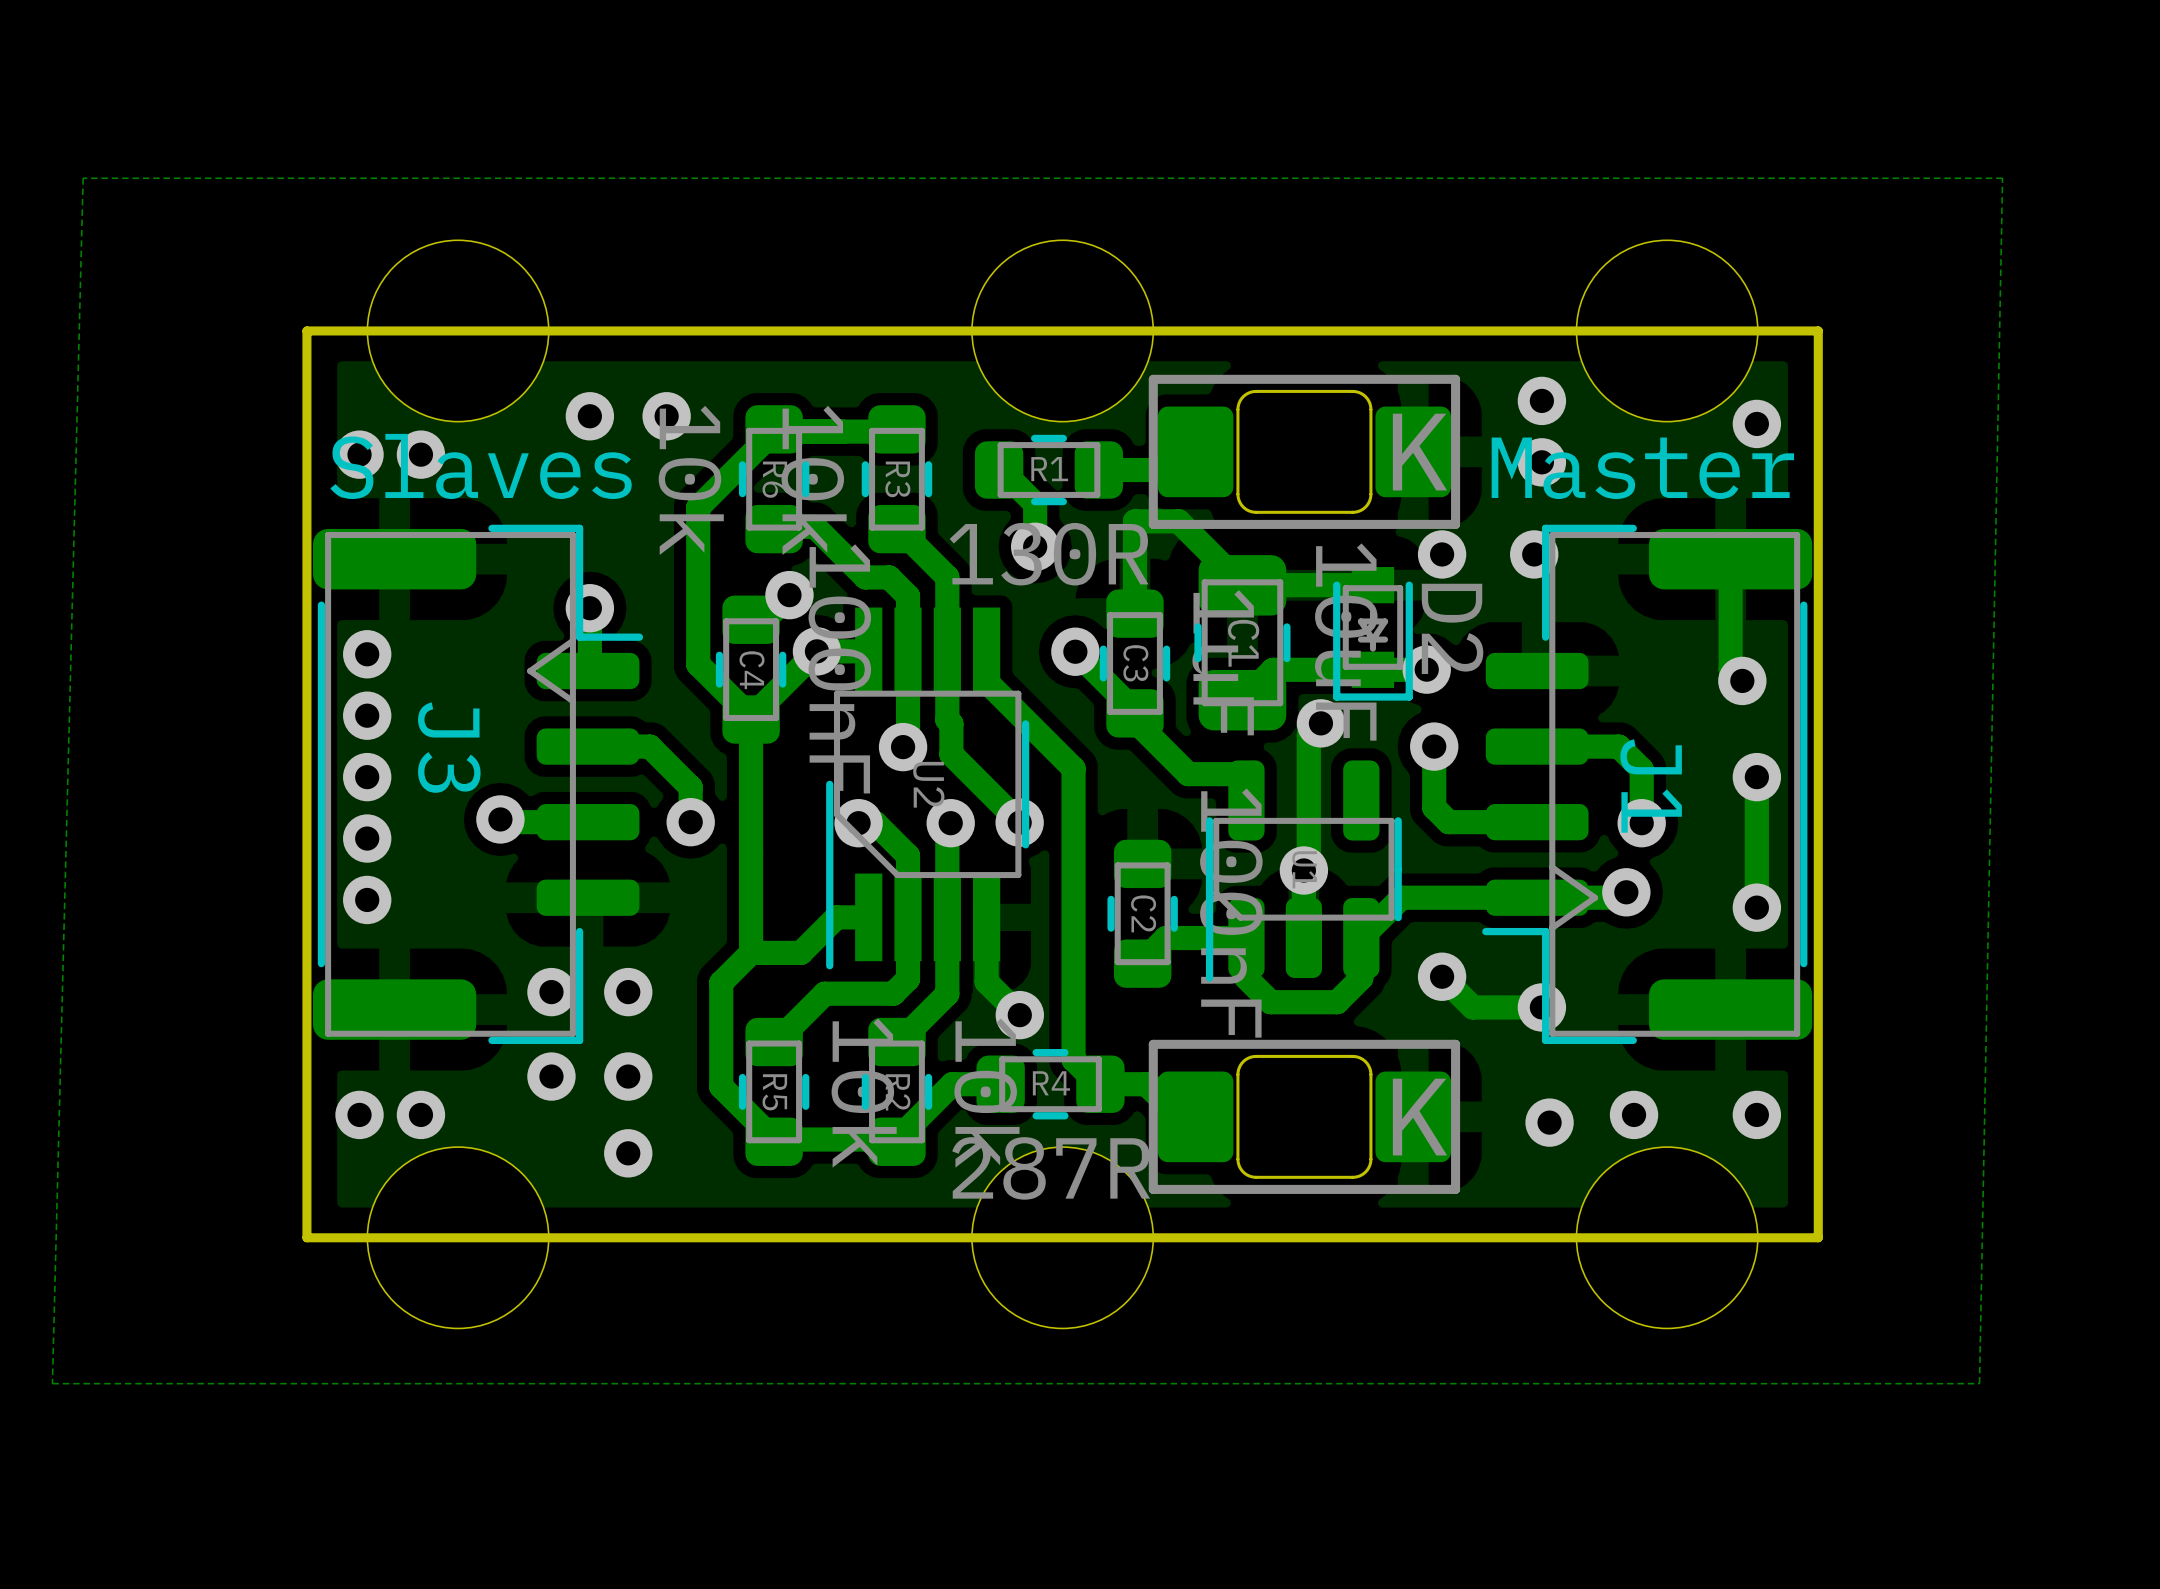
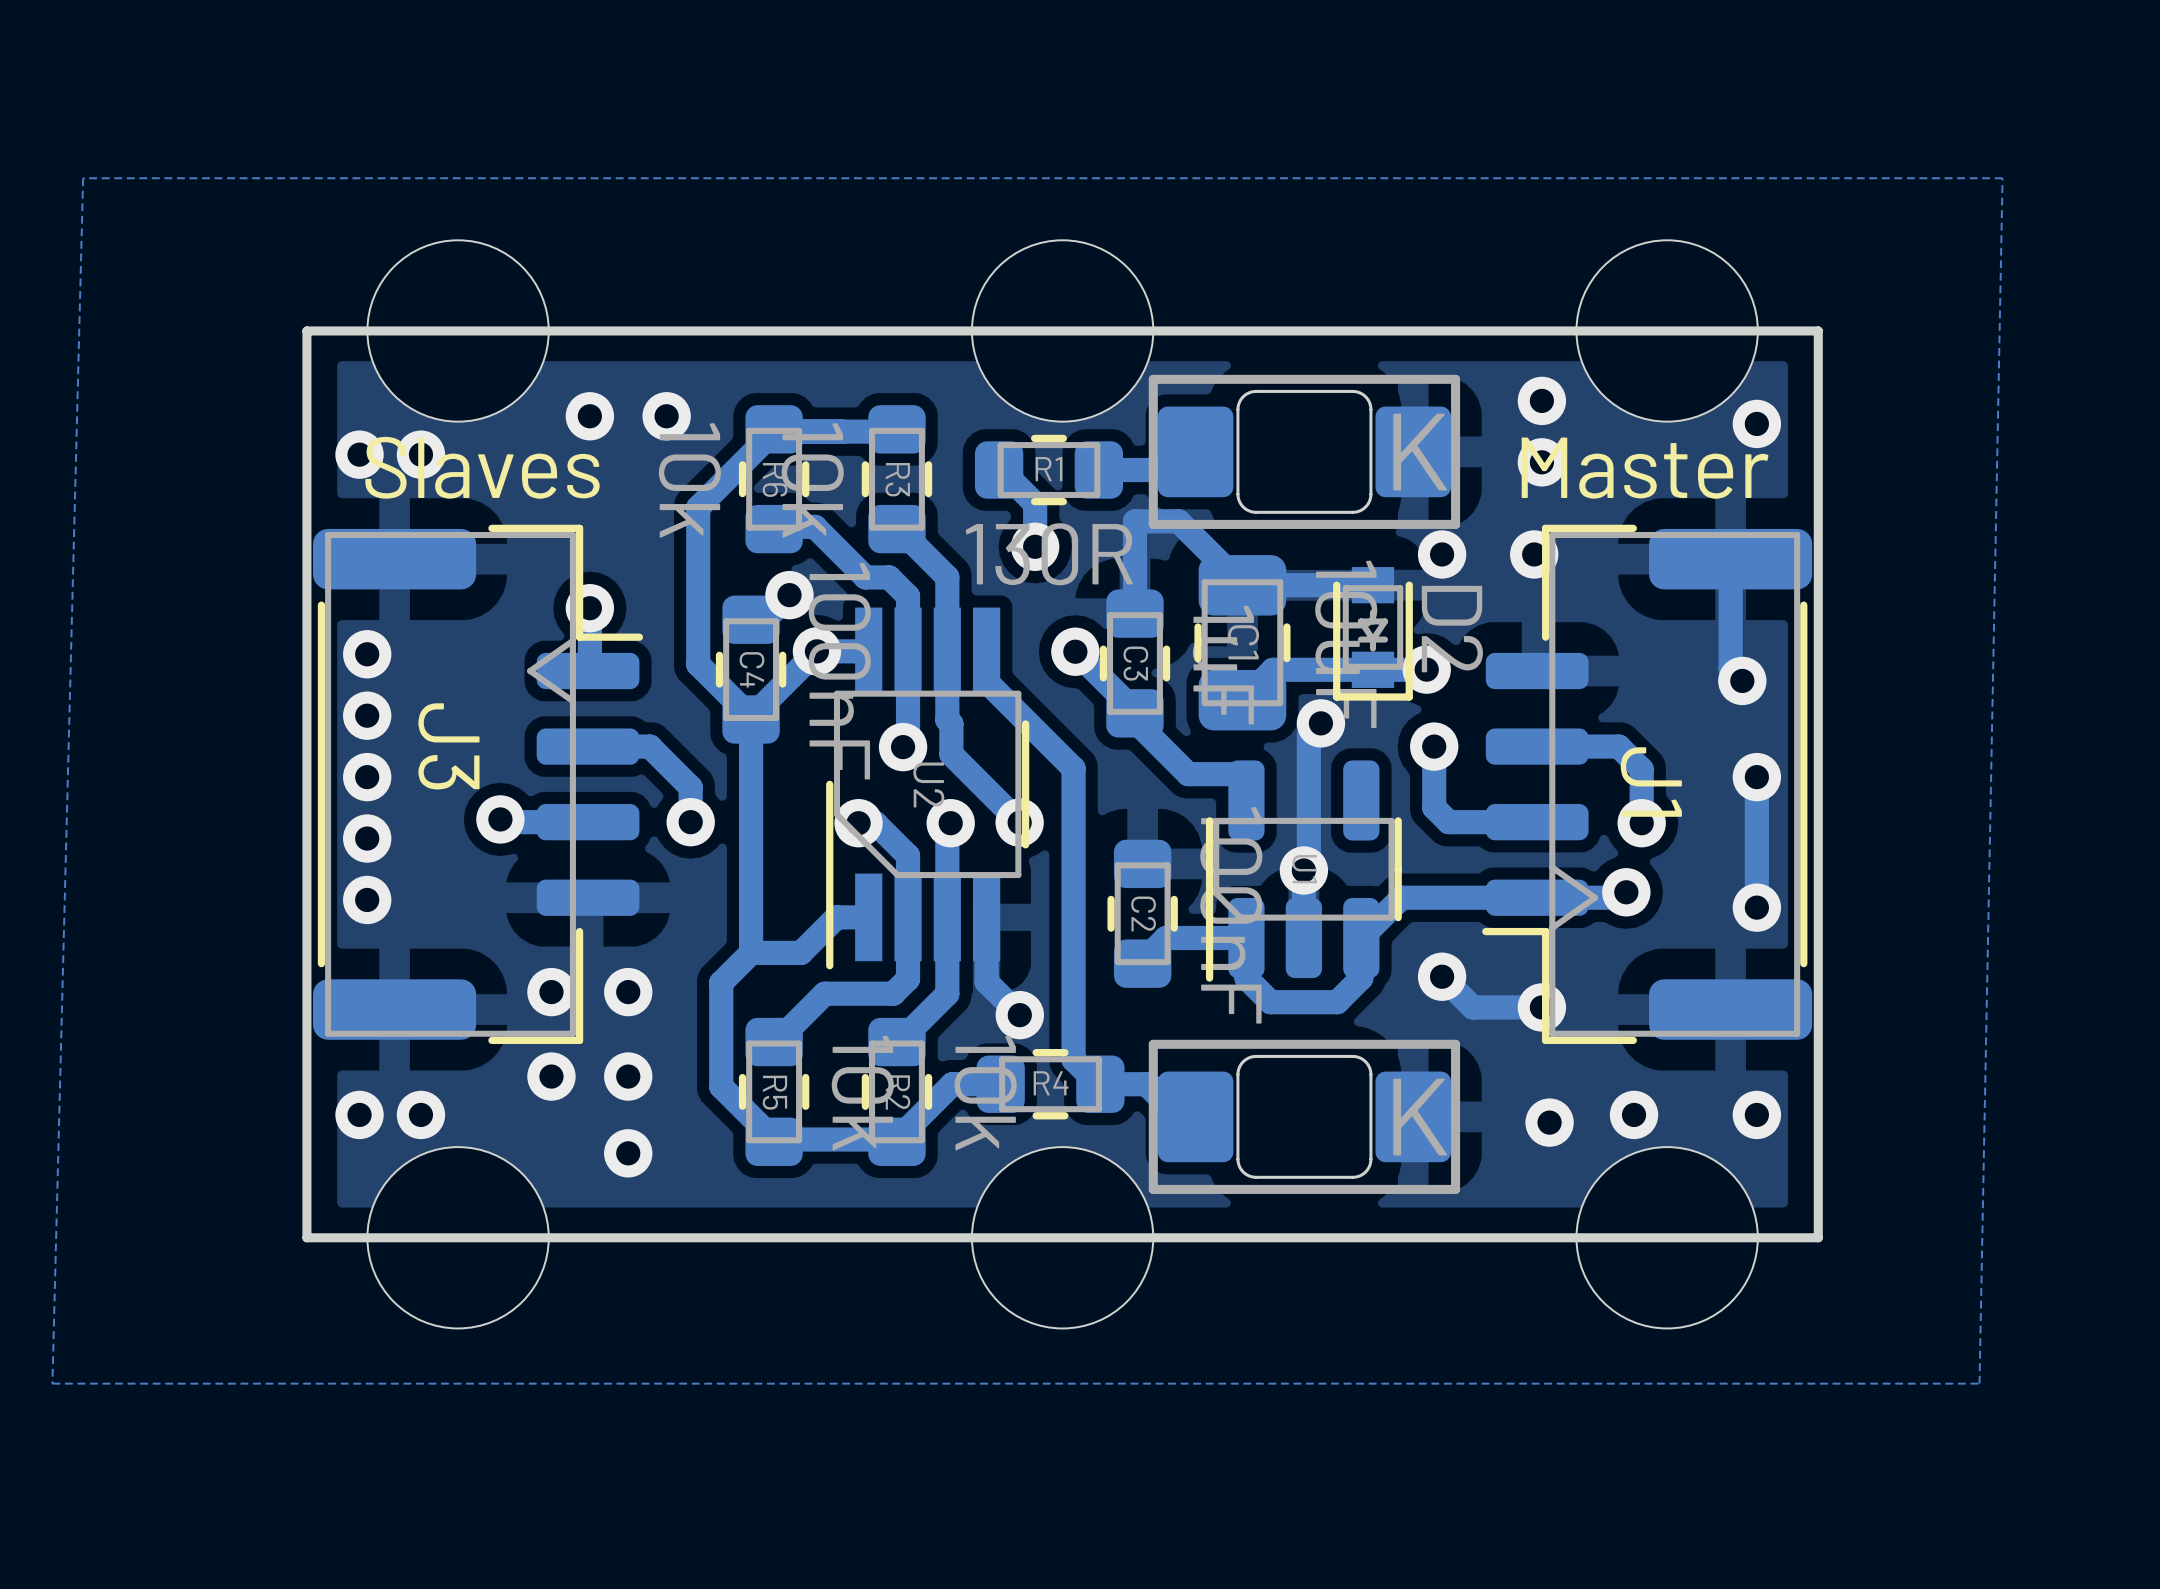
R4 value: 287R (1051, 1168) -> none

